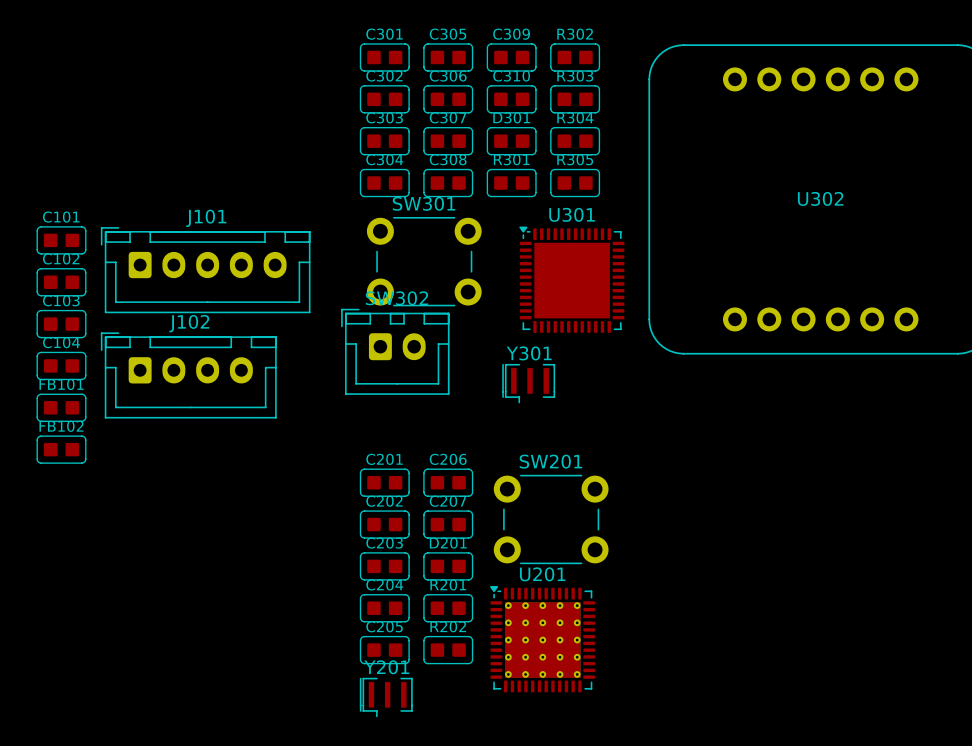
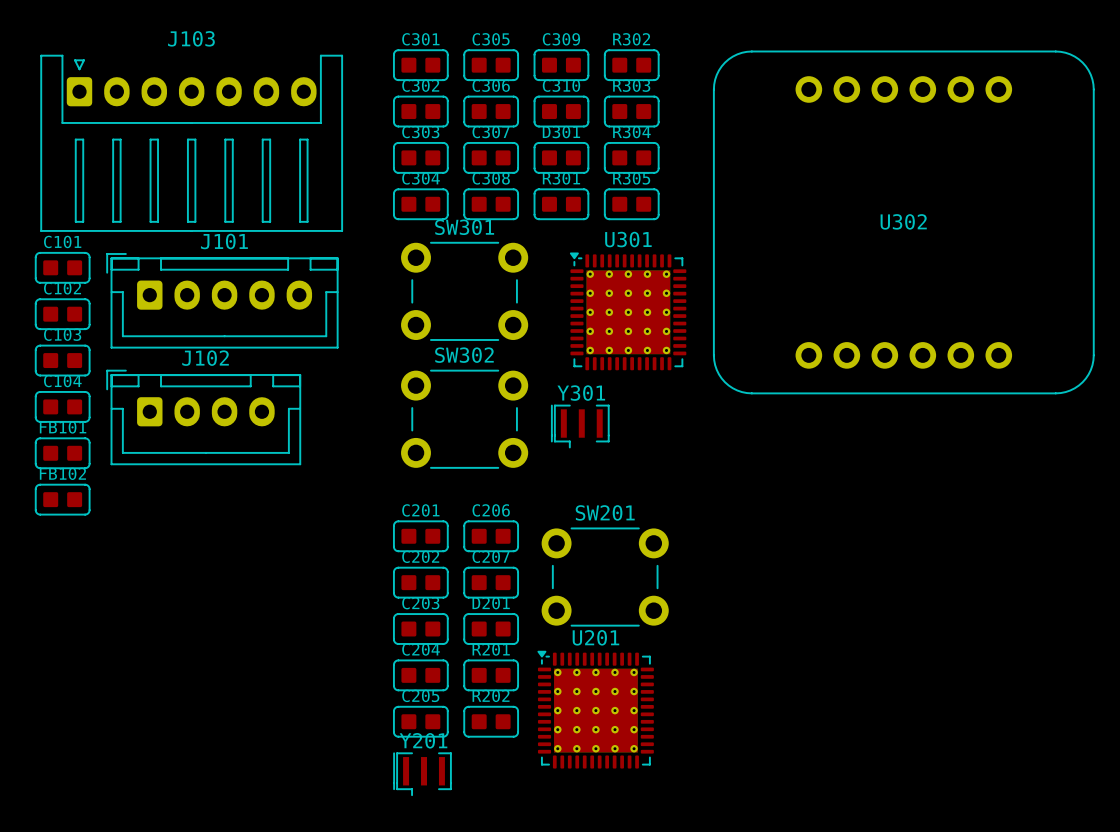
J103: none -> (191, 143)
U301 footprint: [519, 226, 625, 333] -> [569, 252, 687, 371]
SW302 footprint: [341, 308, 450, 395] -> [401, 369, 529, 469]

